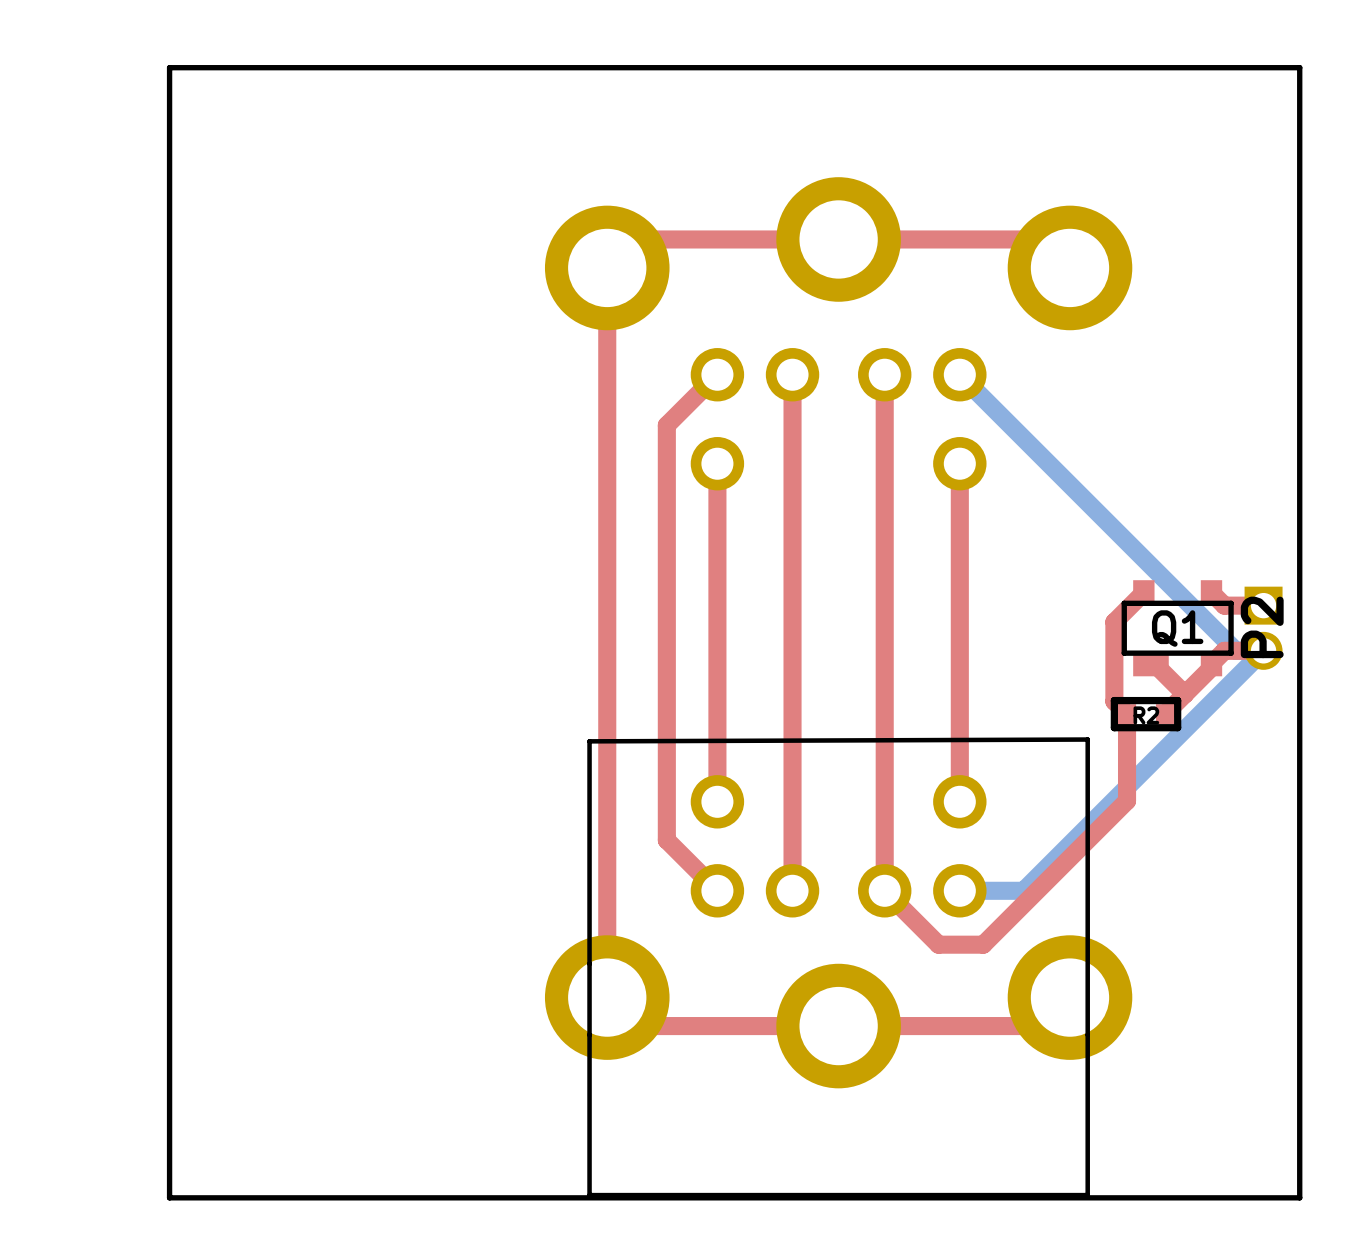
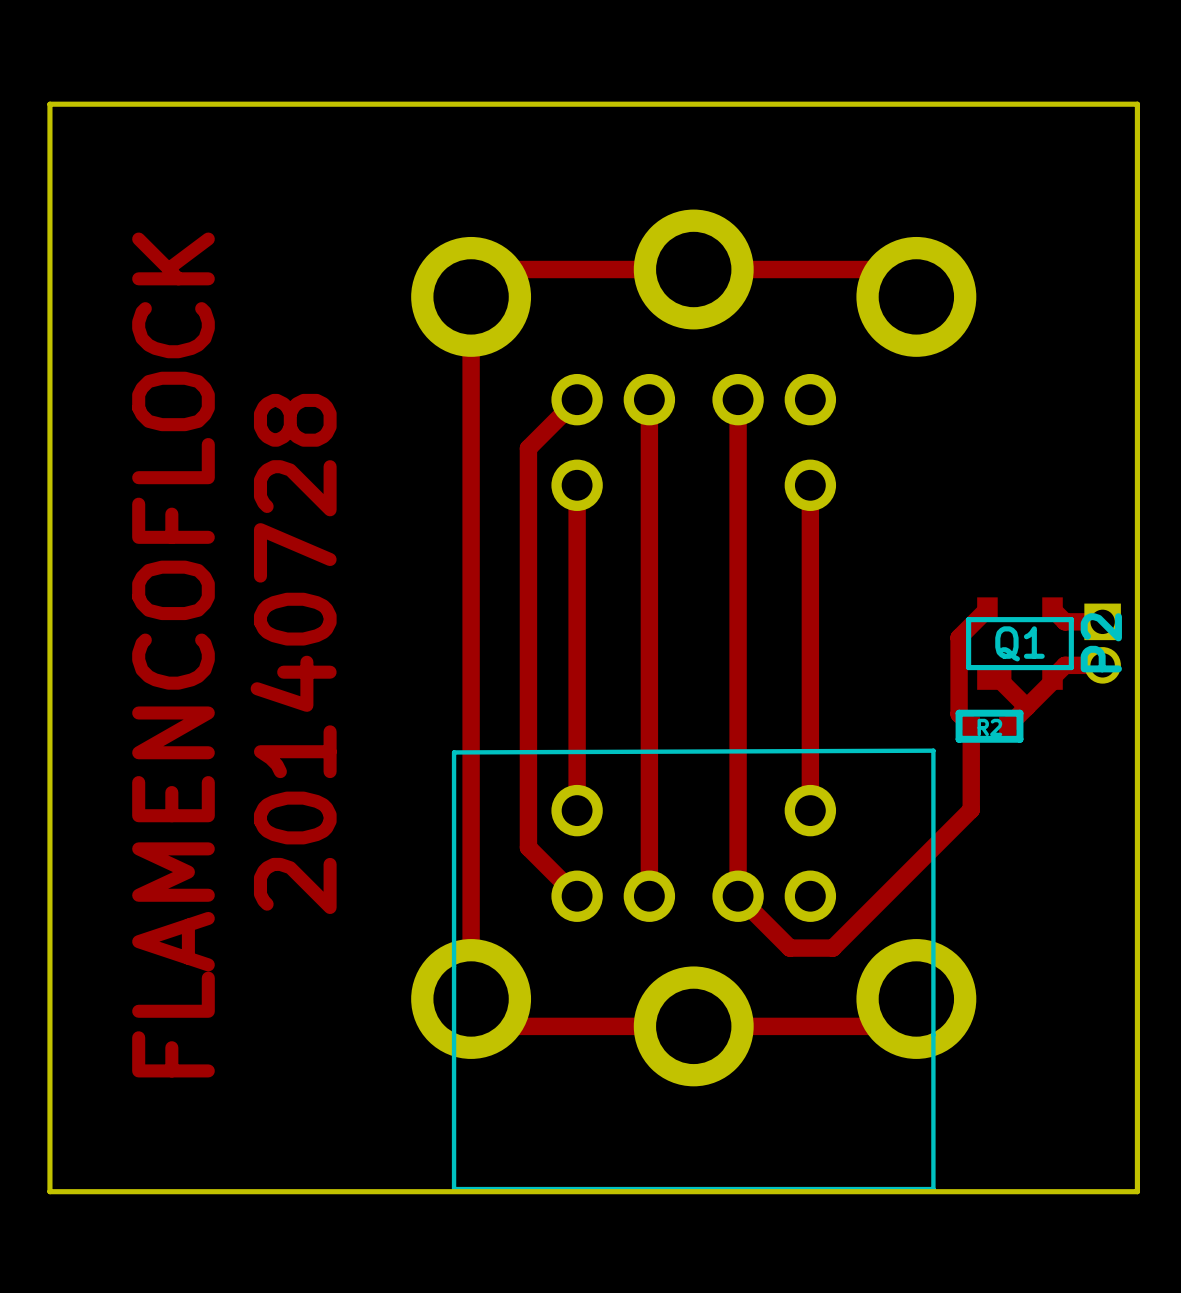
bottom track: (959, 374) (1235, 650) (1263, 650) (1023, 890) (959, 890) -> none
text: none -> 20140728 (293, 653)
text: none -> FLAMENCOFLOCK (173, 654)

